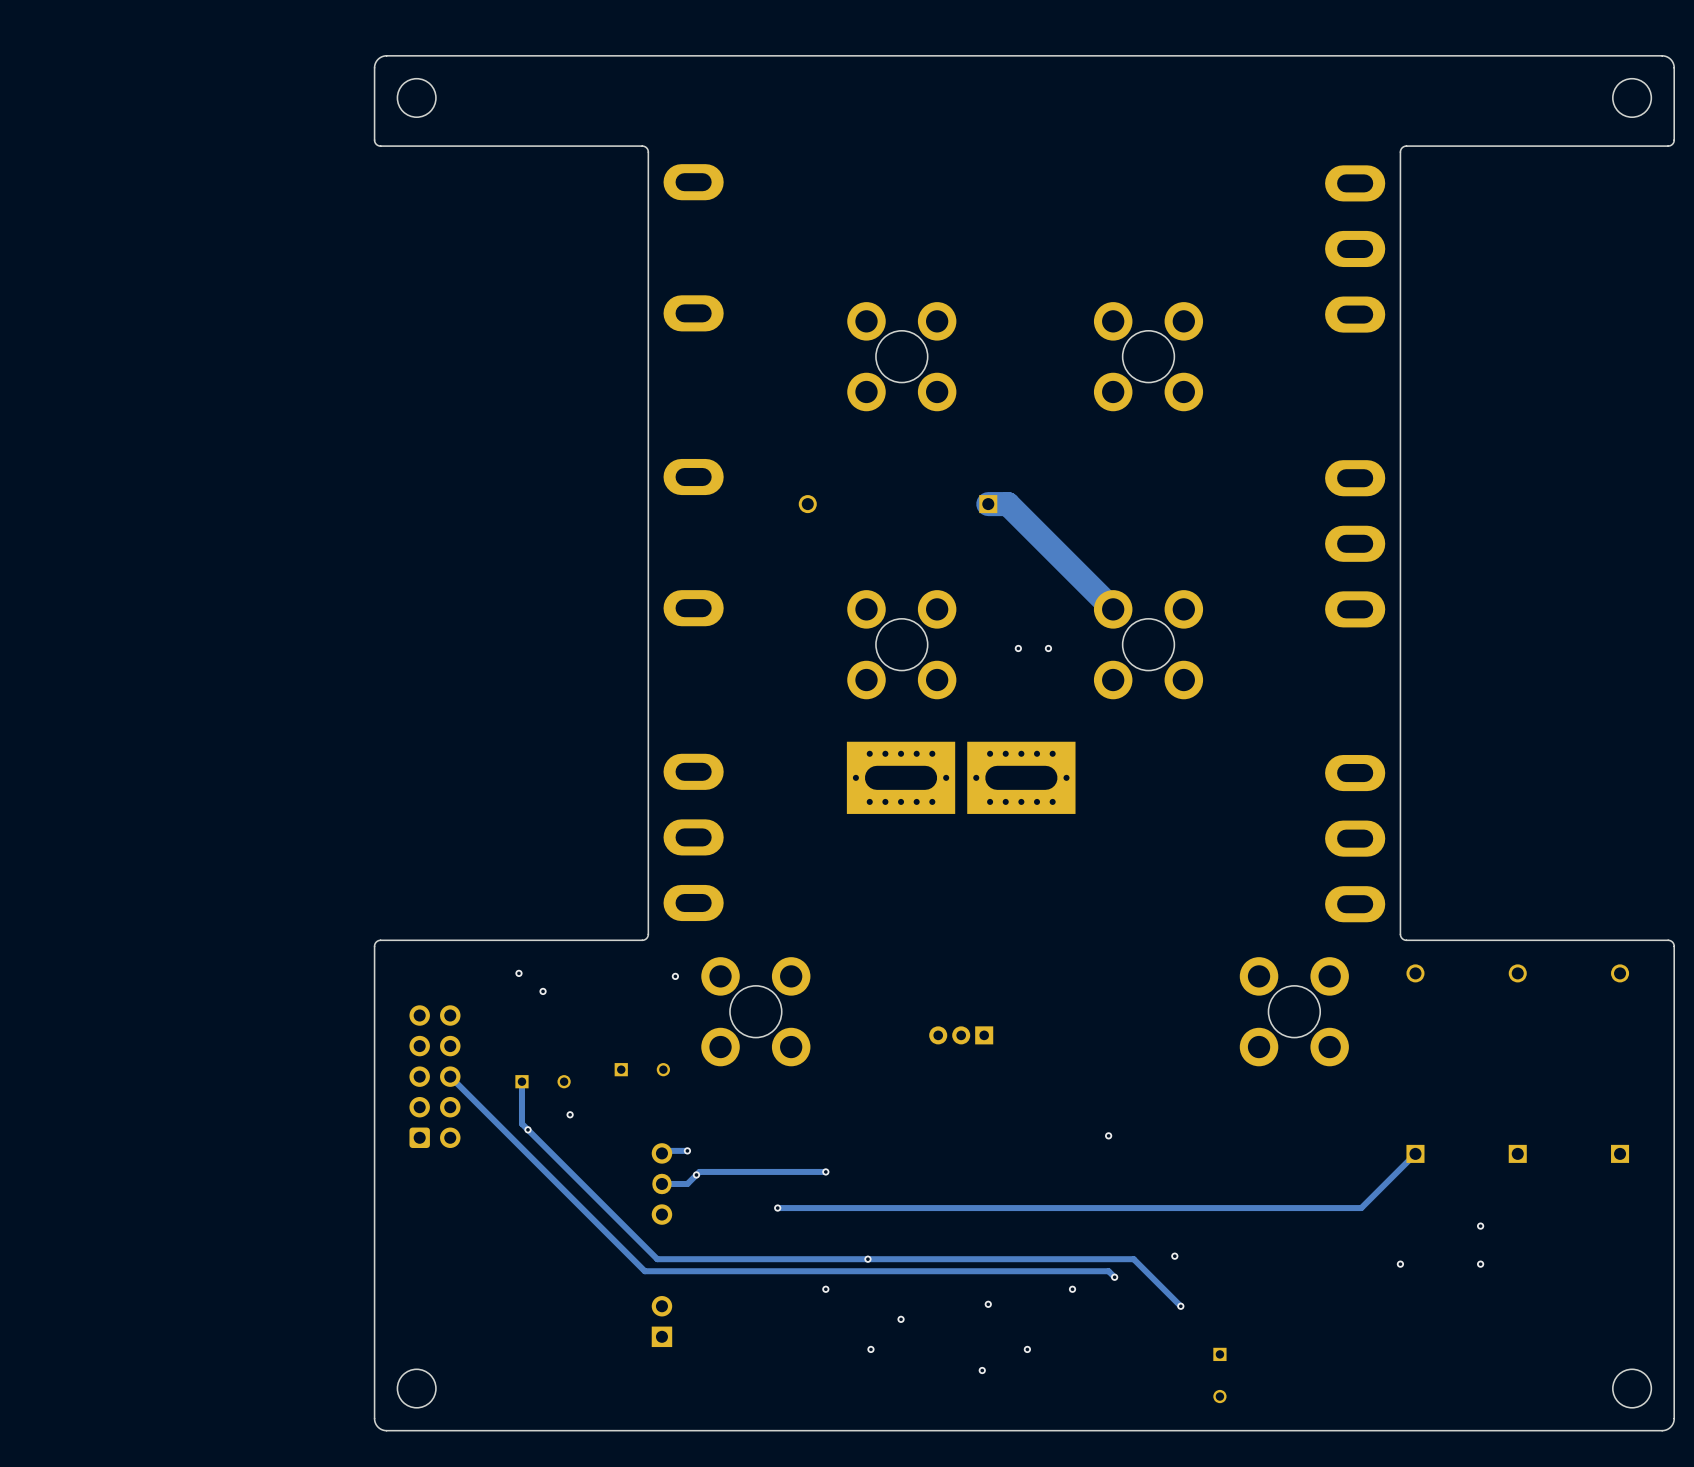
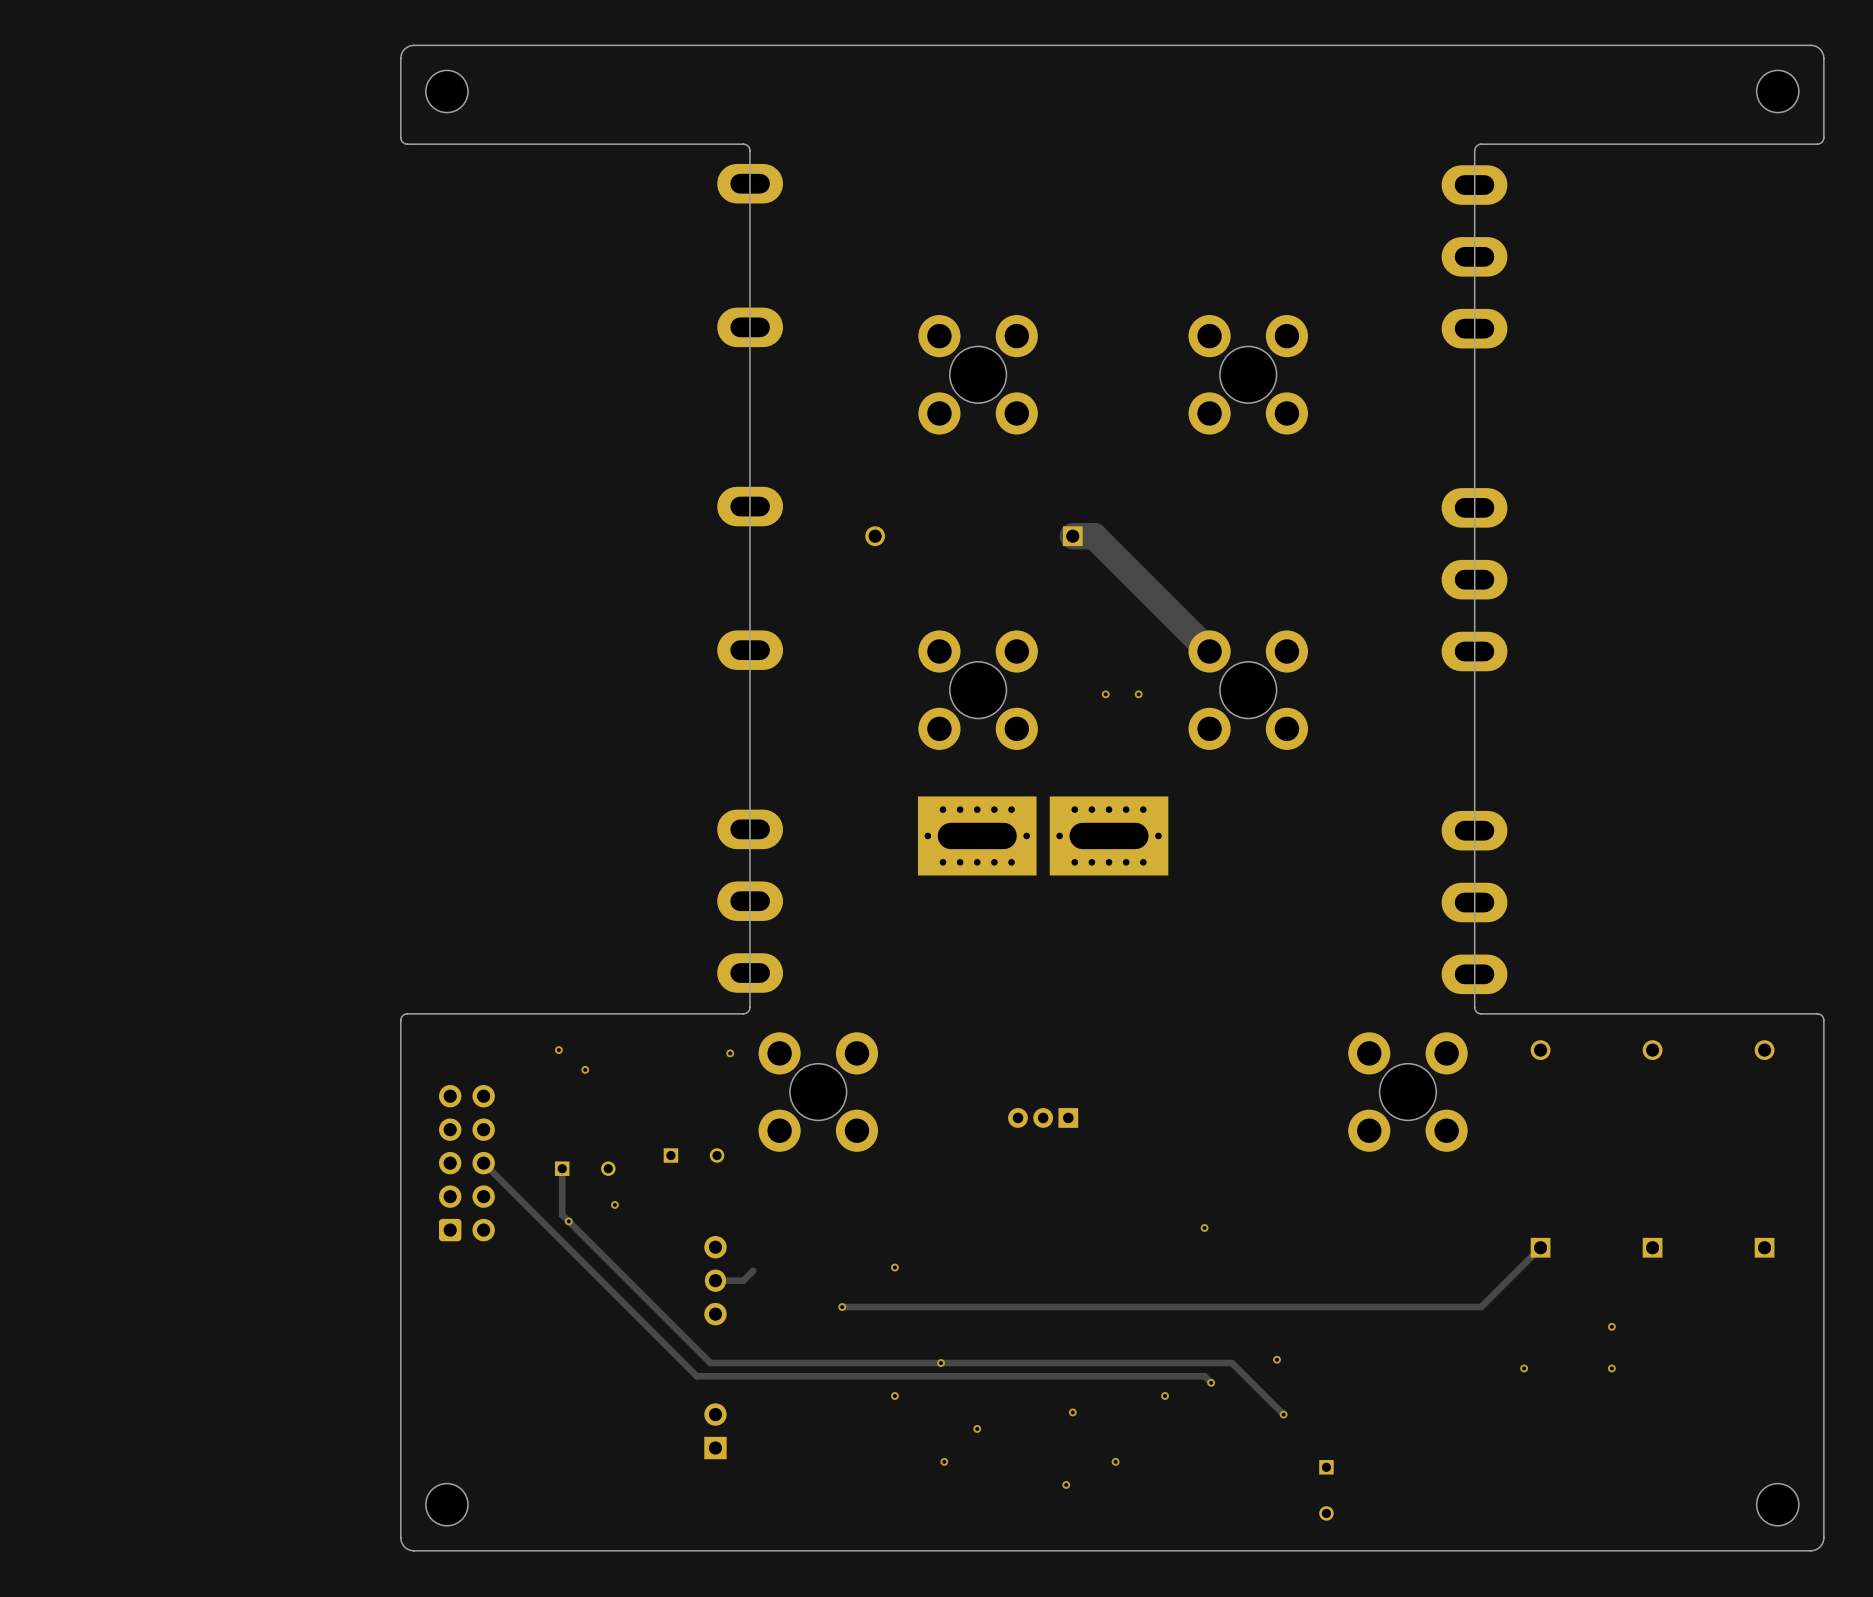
board edge: (642, 146) (646, 147) (648, 152) (648, 934) (646, 938) (642, 940) -> (693, 144) (744, 144) (748, 146) (749, 150) (749, 1007) (748, 1011) (744, 1013) (693, 1013)
board edge: (1406, 146) (1402, 147) (1400, 152) (1400, 934) (1402, 938) (1406, 940) -> (1530, 144) (1480, 144) (1476, 146) (1474, 150) (1474, 1007) (1476, 1011) (1480, 1013) (1530, 1013)
track: (687, 1150) (664, 1150) (661, 1153) -> none
via: (687, 1150) -> none
track: (825, 1171) (699, 1171) (696, 1174) -> none
via: (696, 1174) -> none

